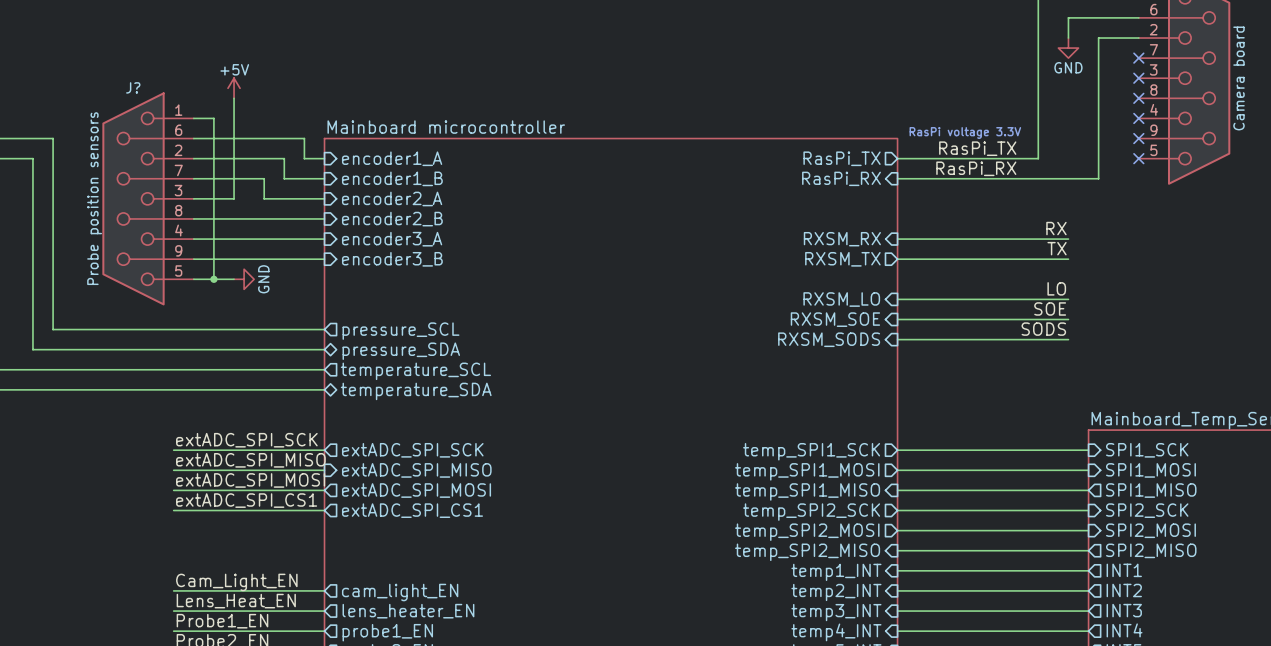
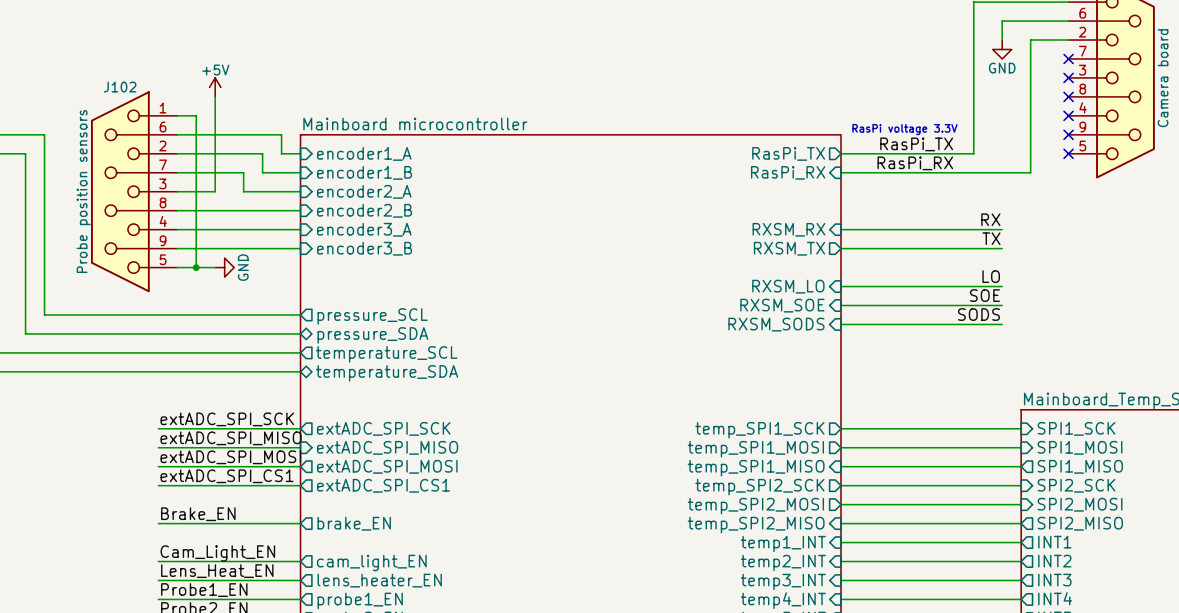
J? name: J? (133, 87) -> J102 (120, 87)
label: none -> Brake_EN (198, 514)
wire: none -> (158, 523) (300, 523)
sheet pin: none -> brake_EN (354, 523)

